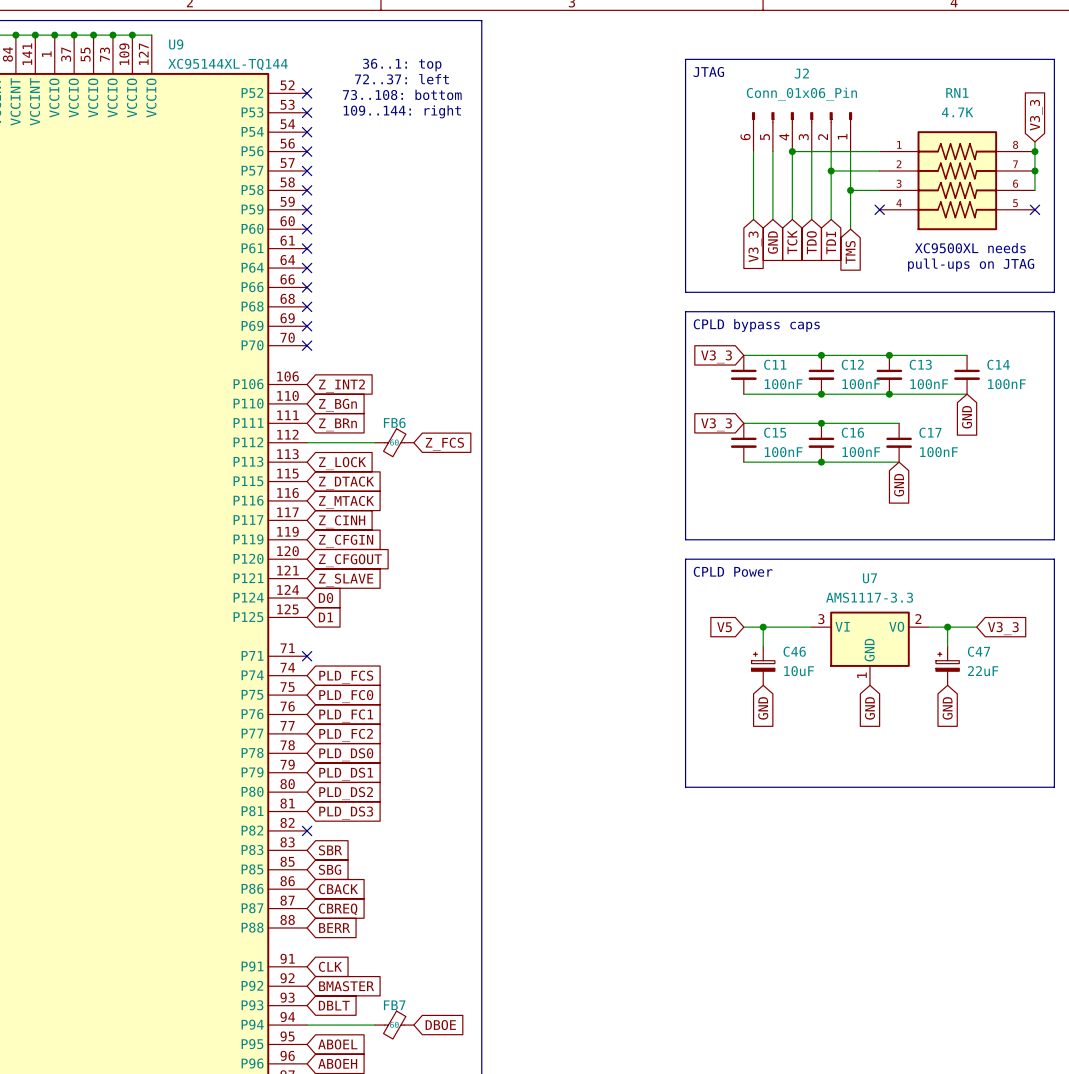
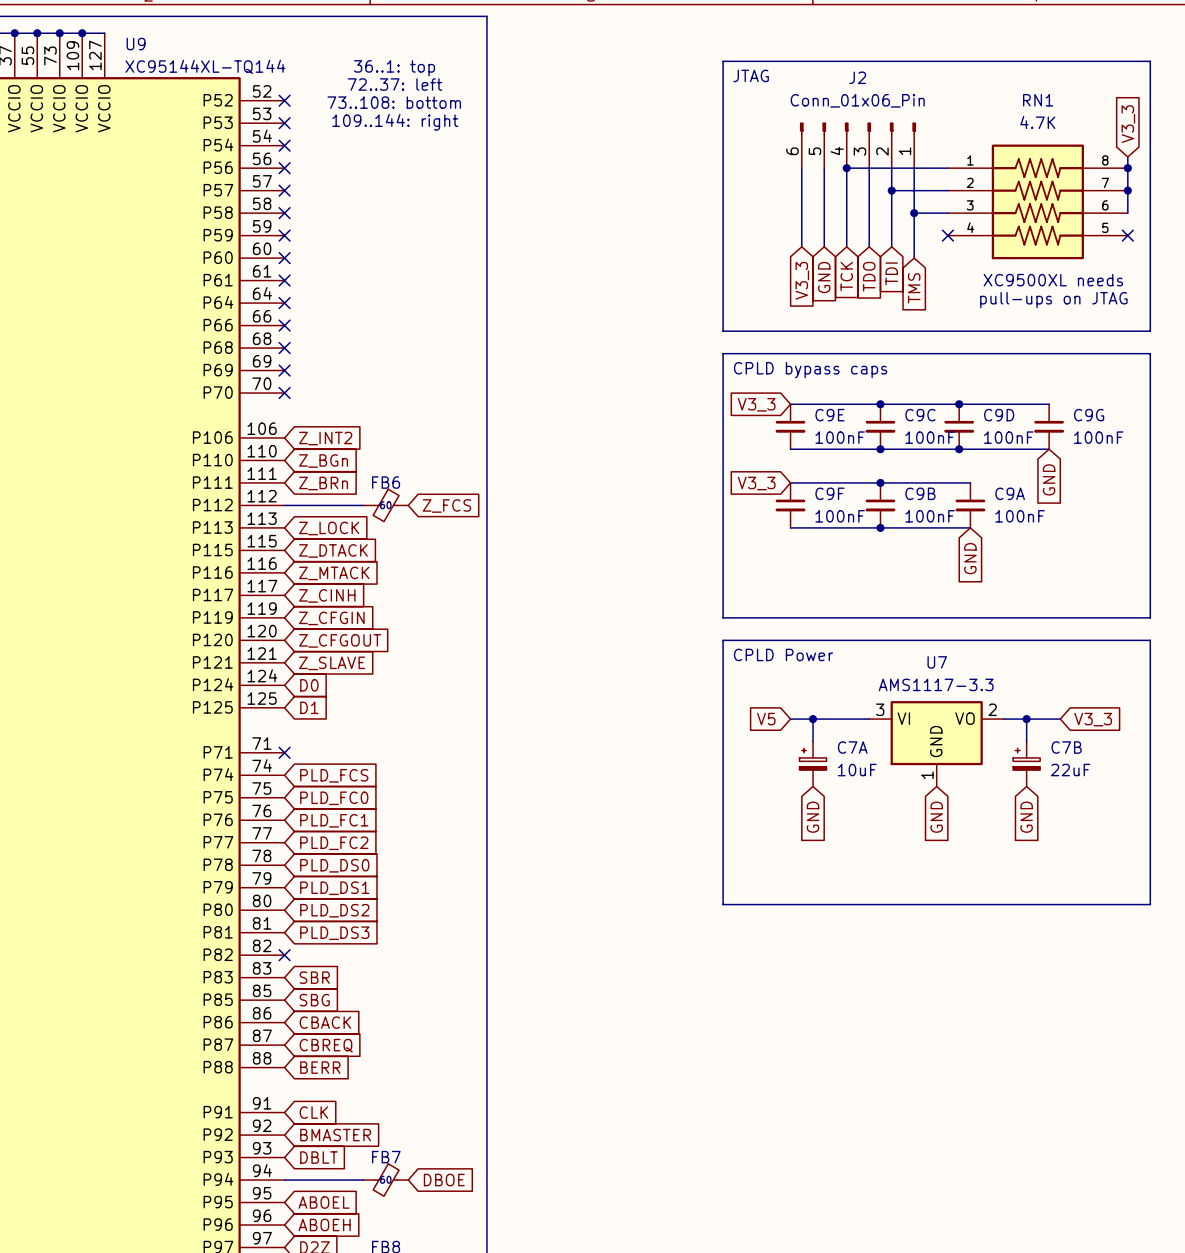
C11 name: C11 (775, 364) -> C9E (829, 415)
C12 name: C12 (852, 364) -> C9C (920, 415)
C13 name: C13 (920, 364) -> C9D (999, 415)
C14 name: C14 (998, 364) -> C9G (1089, 415)
C15 name: C15 (775, 432) -> C9F (829, 493)
C16 name: C16 (852, 432) -> C9B (920, 493)
C17 name: C17 (930, 432) -> C9A (1010, 493)
C46 name: C46 (794, 651) -> C7A (852, 747)
C47 name: C47 (979, 651) -> C7B (1066, 747)

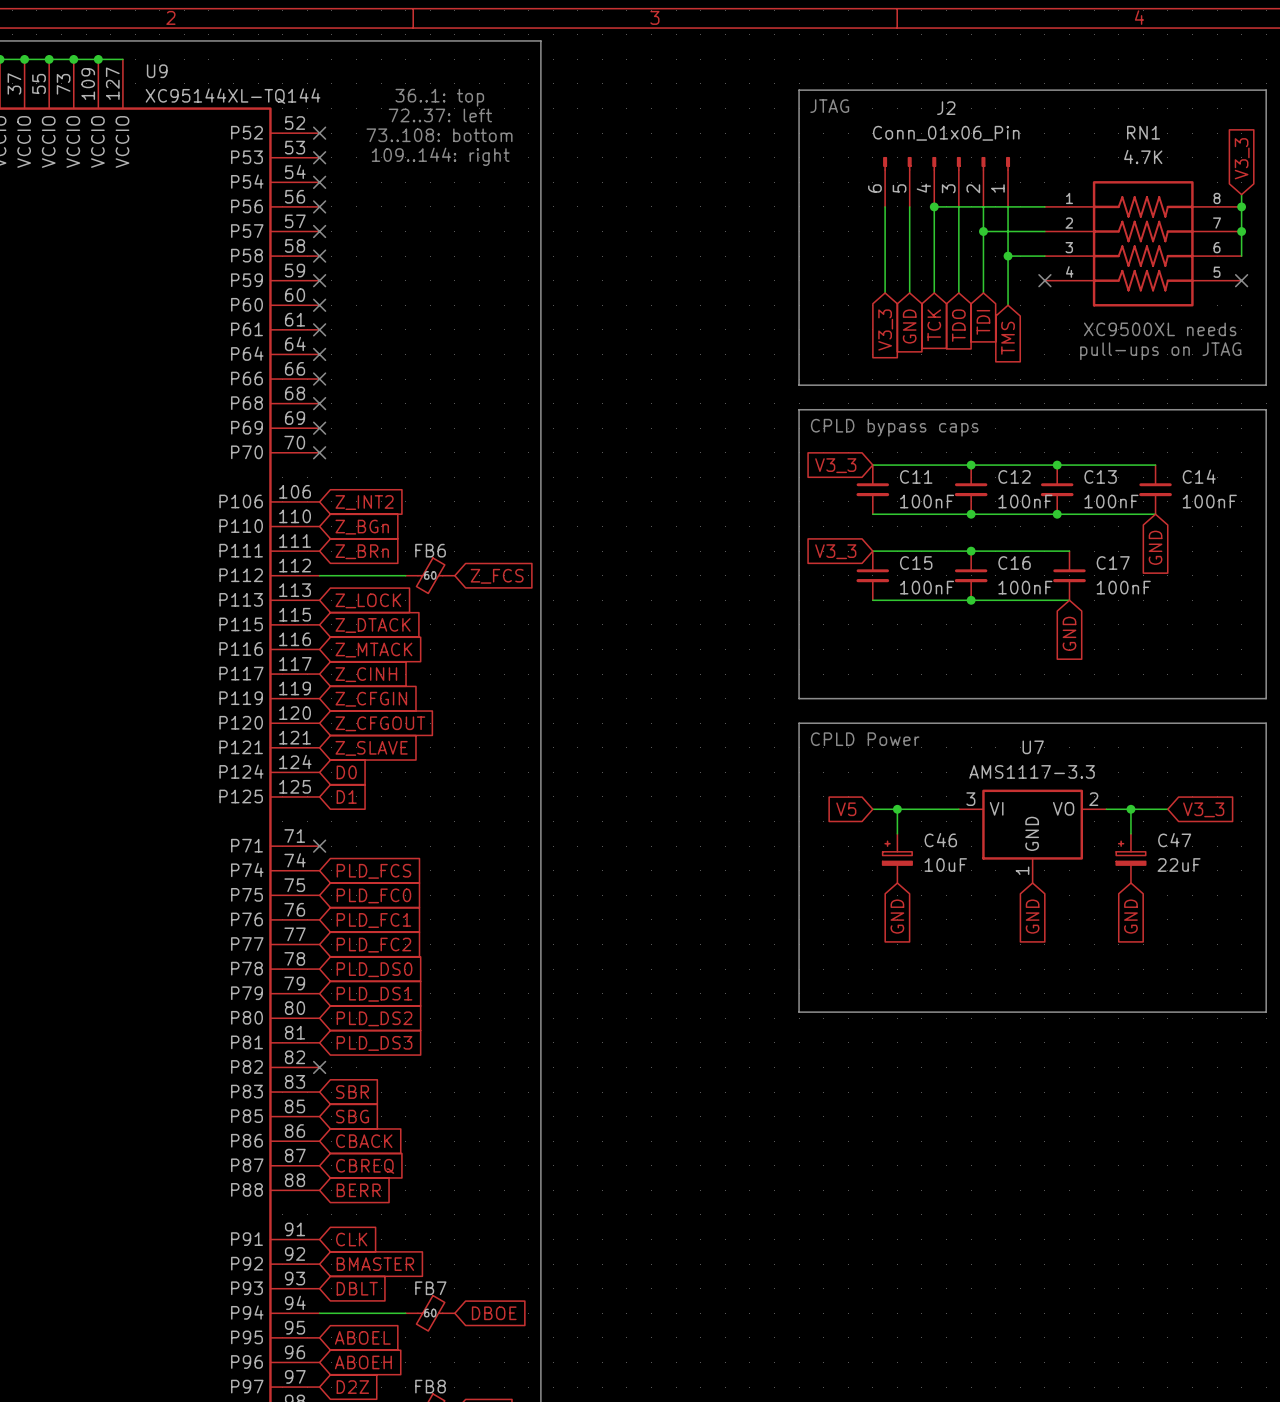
C9E name: C9E (829, 415) -> C11 (916, 476)
C9C name: C9C (920, 415) -> C12 (1014, 476)
C9D name: C9D (999, 415) -> C13 (1100, 476)
C9G name: C9G (1089, 415) -> C14 (1199, 476)
C9F name: C9F (829, 493) -> C15 (916, 563)
C9B name: C9B (920, 493) -> C16 (1014, 563)
C9A name: C9A (1010, 493) -> C17 (1113, 563)
C7A name: C7A (852, 747) -> C46 (940, 840)
C7B name: C7B (1066, 747) -> C47 (1174, 840)

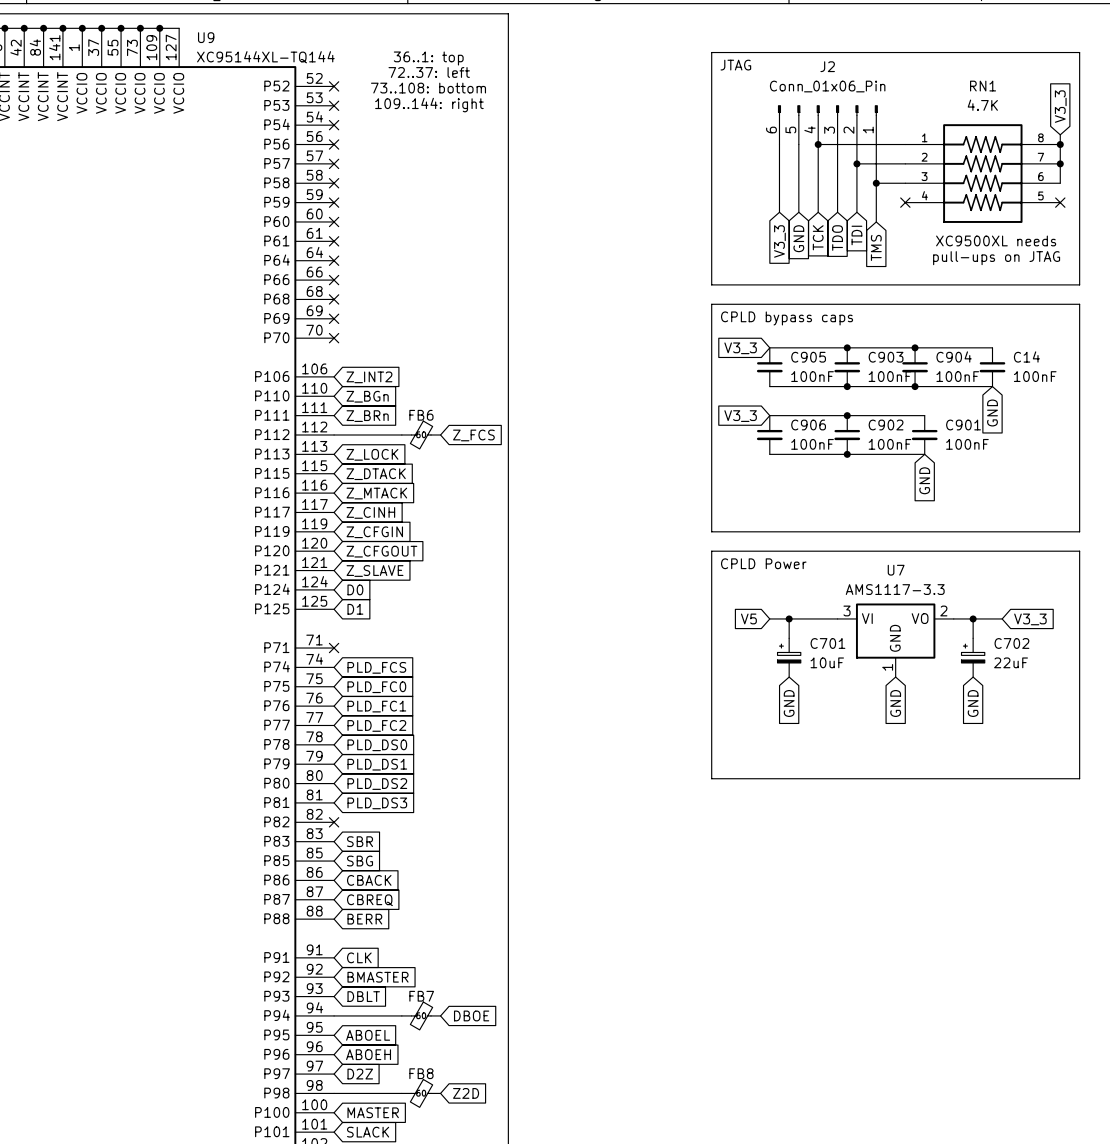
C11 name: C11 (916, 476) -> C905 (808, 357)
C12 name: C12 (1014, 476) -> C903 (886, 357)
C13 name: C13 (1100, 476) -> C904 (954, 356)
C15 name: C15 (916, 563) -> C906 (808, 425)
C16 name: C16 (1014, 563) -> C902 (886, 425)
C17 name: C17 (1113, 563) -> C901 (963, 425)
C46 name: C46 (940, 840) -> C701 (827, 643)
C47 name: C47 (1174, 840) -> C702 (1011, 643)

